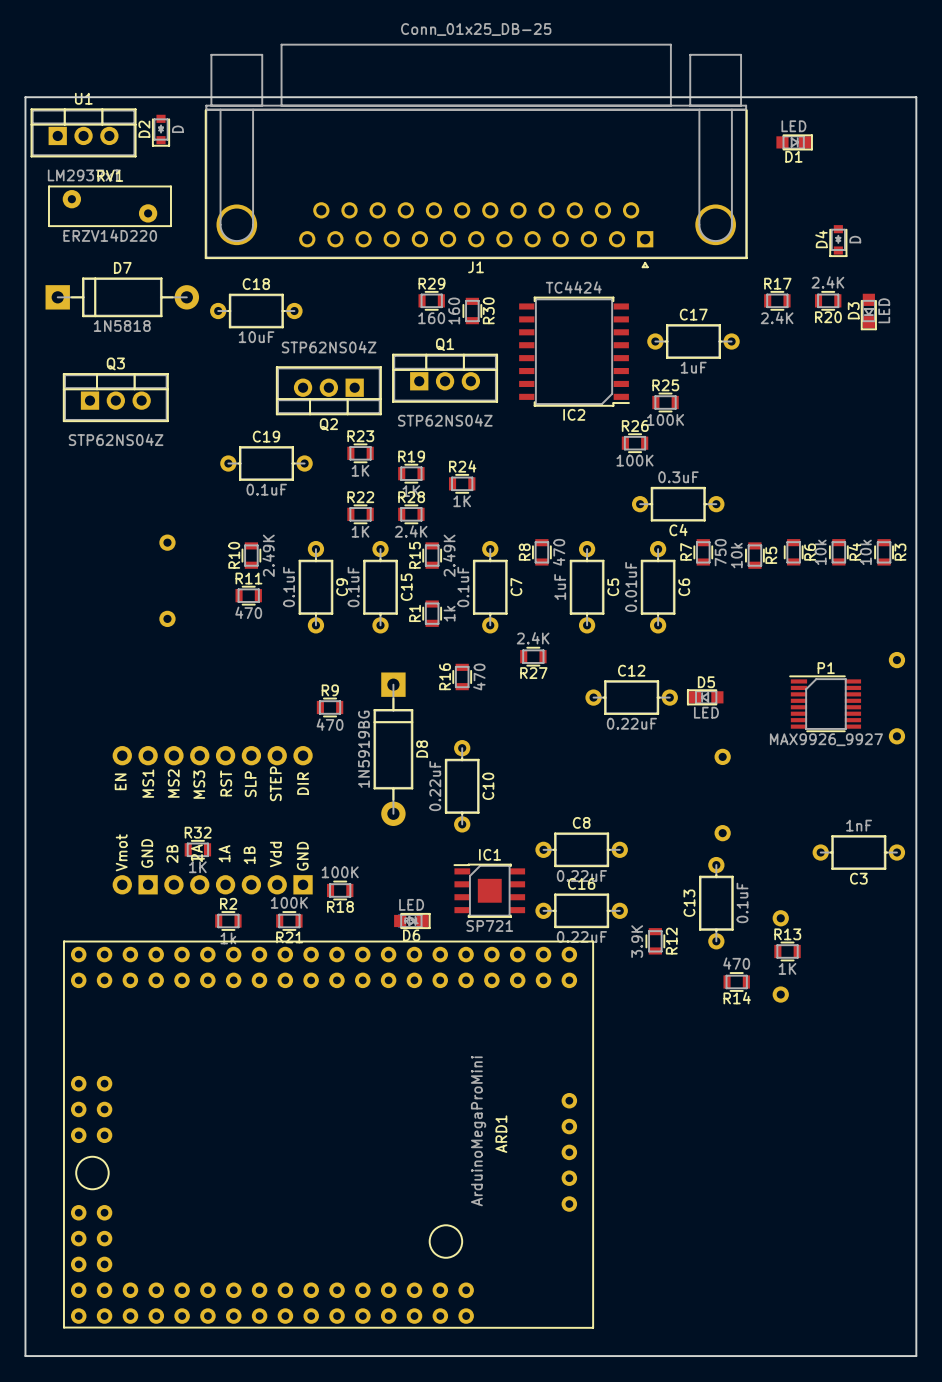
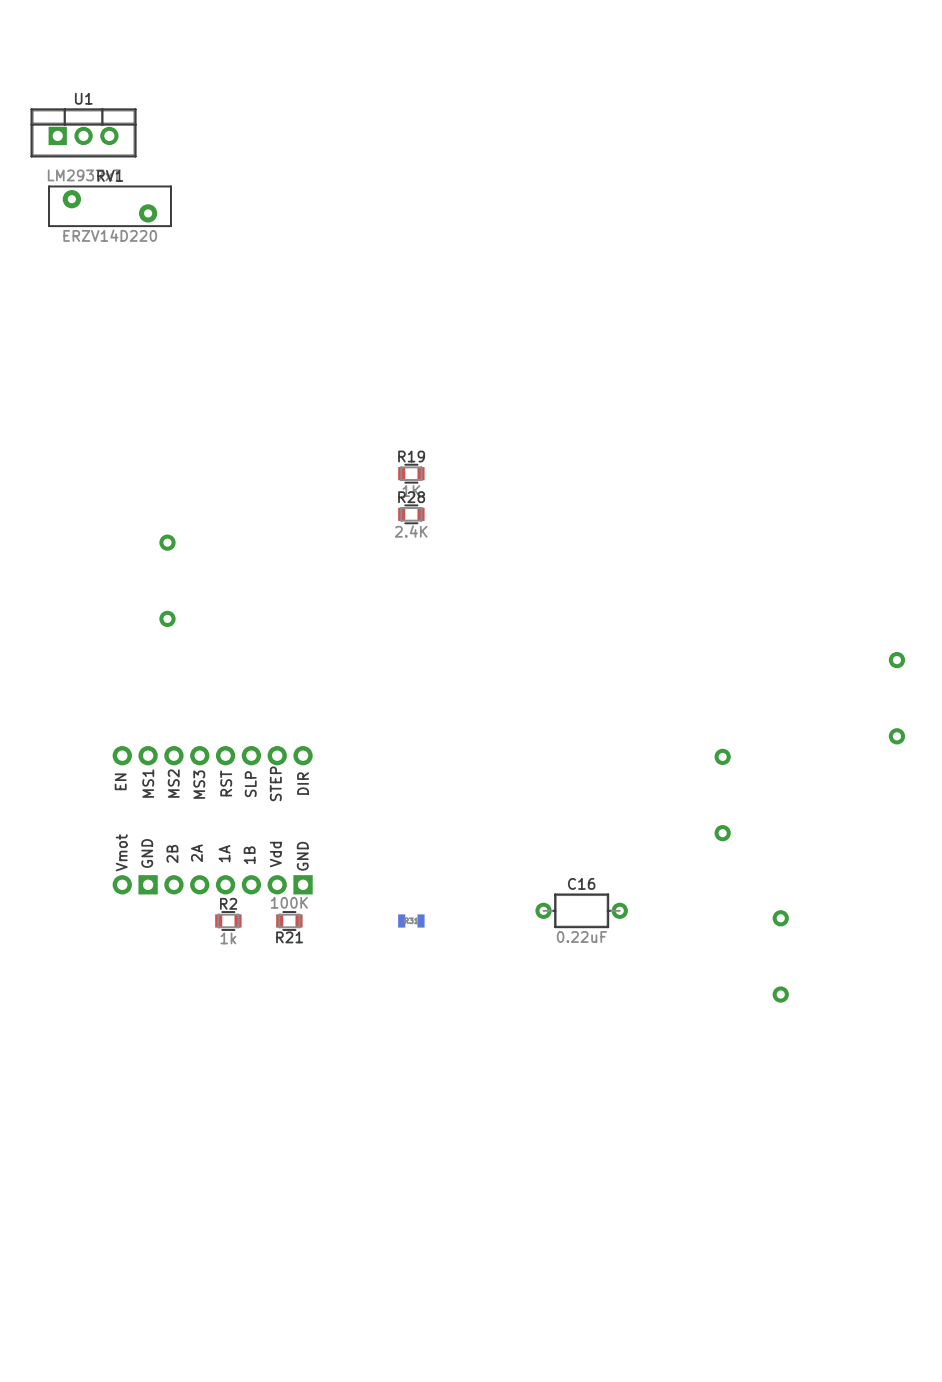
board edge: (25, 97) (916, 97) (916, 1356) (25, 1356) (25, 97) -> none
D2: D (161, 130) -> none
D1: LED (794, 142) -> none
J1: Conn_01x25_DB-25 (476, 156) -> none
D4: D (838, 240) -> none
D7: 1N5818 (122, 297) -> none
R29: 160 (431, 300) -> none
R17: 2.4K (777, 300) -> none
R20: 2.4K (828, 300) -> none
C18: 10uF (256, 311) -> none
R30: 160 (472, 311) -> none
D3: LED (868, 311) -> none
C17: 1uF (693, 341) -> none
IC2: TC4424 (574, 351) -> none
Q1: STP62NS04Z (445, 378) -> none
Q2: STP62NS04Z (328, 390) -> none
Q3: STP62NS04Z (115, 397) -> none
R25: 100K (665, 402) -> none
R26: 100K (635, 443) -> none
R23: 1K (360, 453) -> none
C19: 0.1uF (266, 463) -> none
R24: 1K (462, 483) -> none
C4: 0.3uF (678, 504) -> none
R22: 1K (360, 514) -> none
R8: 470 (541, 552) -> none
R7: 750 (703, 552) -> none
R6: (793, 552) -> none
R4: 10k (838, 552) -> none
R3: 10k (884, 552) -> none
R10: 2.49K (251, 555) -> none
R15: 2.49K (432, 555) -> none
R5: 10k (754, 555) -> none
C9: 0.1uF (315, 587) -> none
C15: 0.1uF (380, 587) -> none
C7: 0.1uF (490, 587) -> none
C5: 1uF (587, 587) -> none
C6: 0.01uF (658, 587) -> none
R11: 470 (248, 595) -> none
R1: 1k (432, 613) -> none
R27: 2.4K (533, 656) -> none
R16: 470 (462, 677) -> none
C12: 0.22uF (631, 697) -> none
D5: LED (705, 697) -> none
P1: MAX9926_9927 (825, 703) -> none
R9: 470 (330, 707) -> none
D8: 1N5919BG (393, 749) -> none
C10: 0.22uF (462, 786) -> none
R32: 1K (197, 849) -> none
C8: 0.22uF (581, 849) -> none
C3: 1nF (858, 852) -> none
R18: 100K (340, 890) -> none
IC1: SP721 (489, 890) -> none
C13: 0.1uF (716, 903) -> none
D6: LED (412, 920) -> none
R12: 3.9K (655, 941) -> none
R13: 1K (787, 951) -> none
R14: 470 (736, 981) -> none
ARD1: ArduinoMegaProMini (328, 1134) -> none

